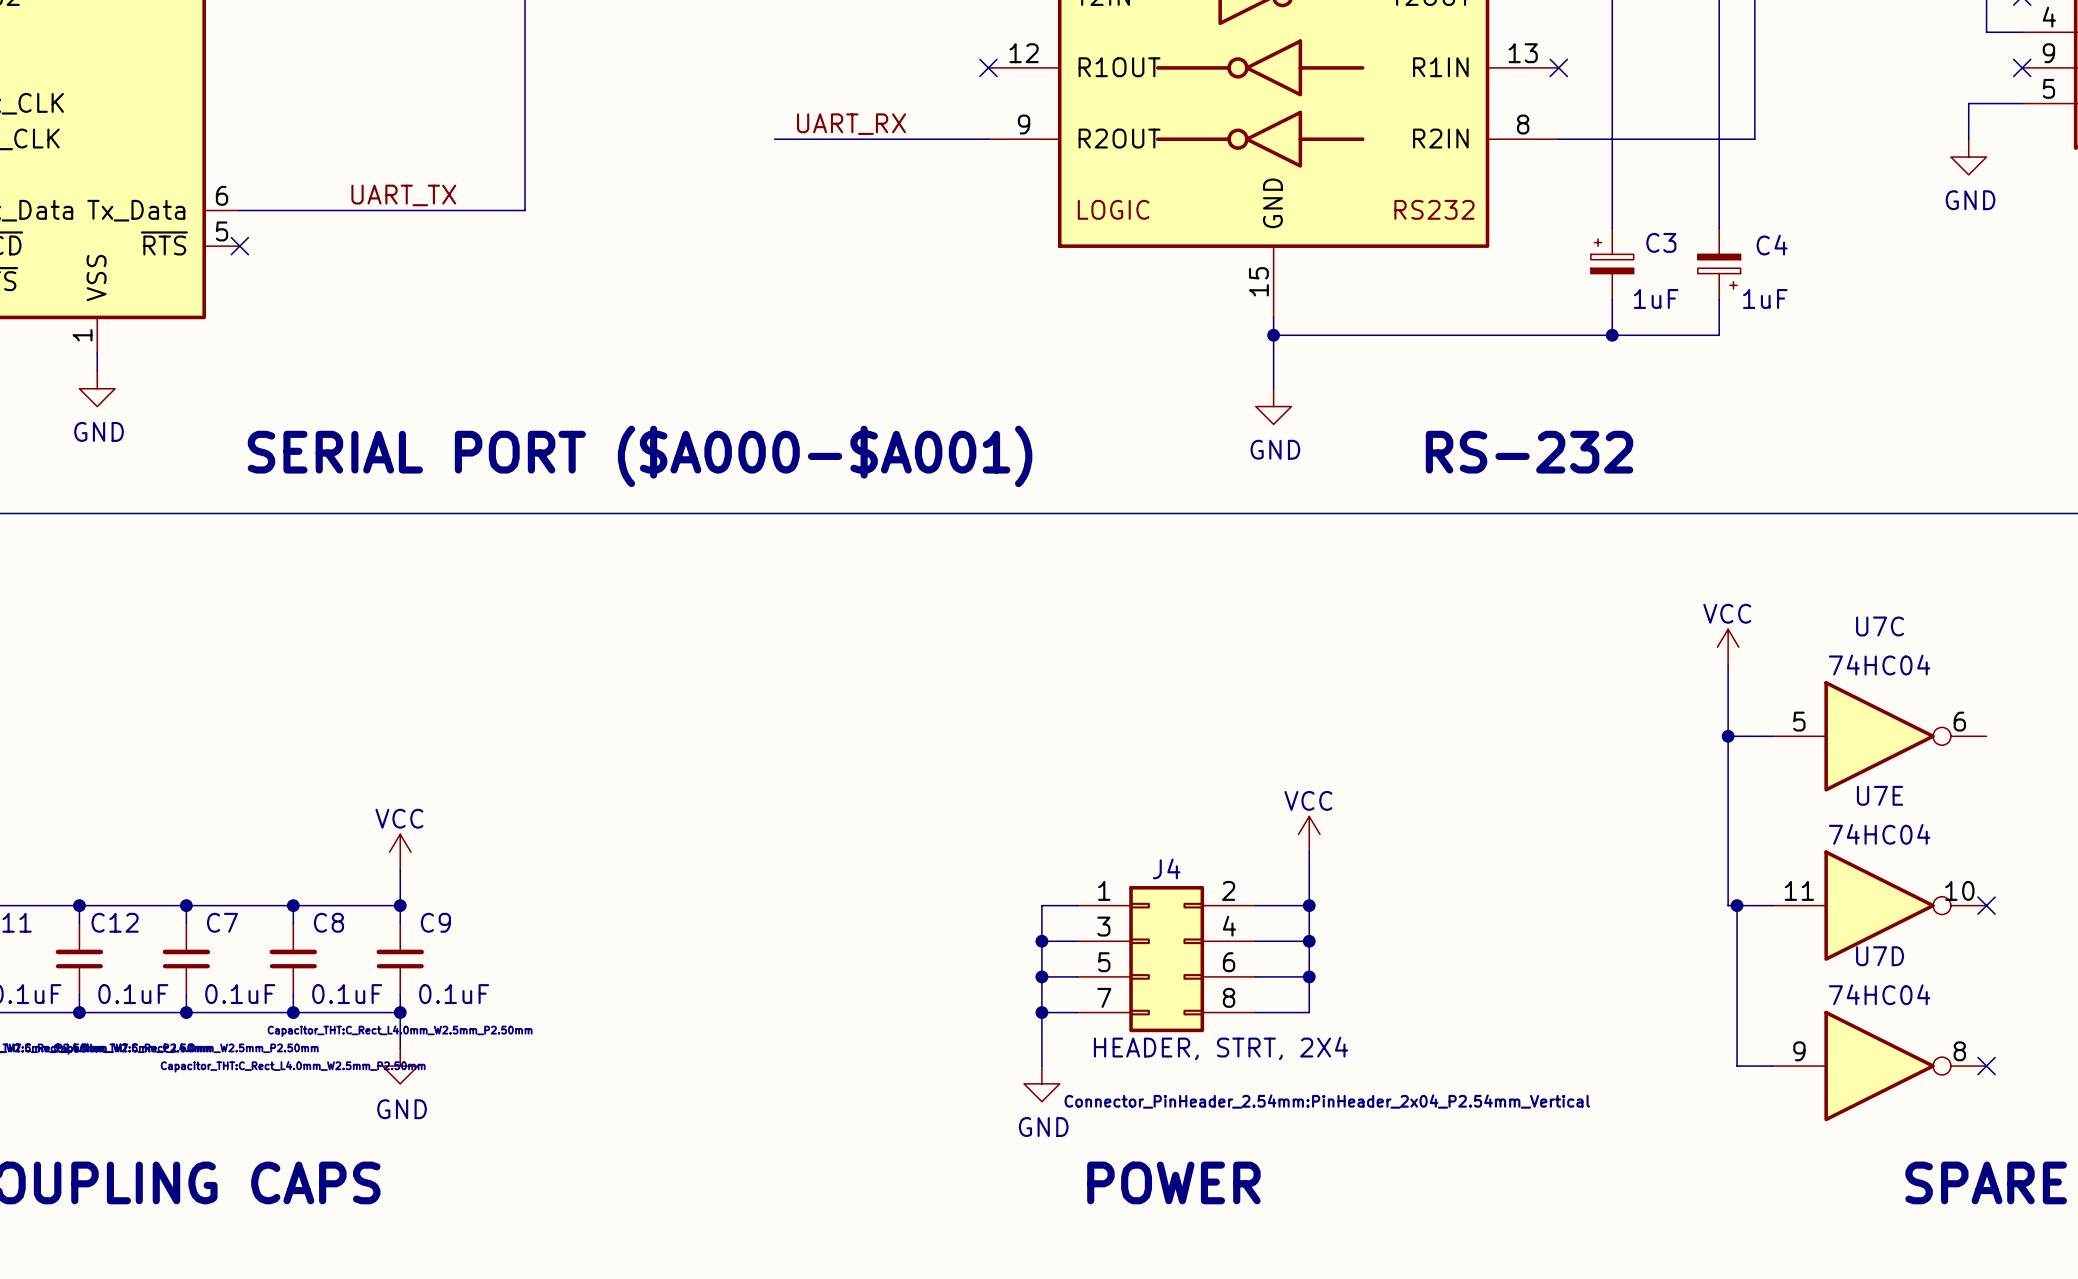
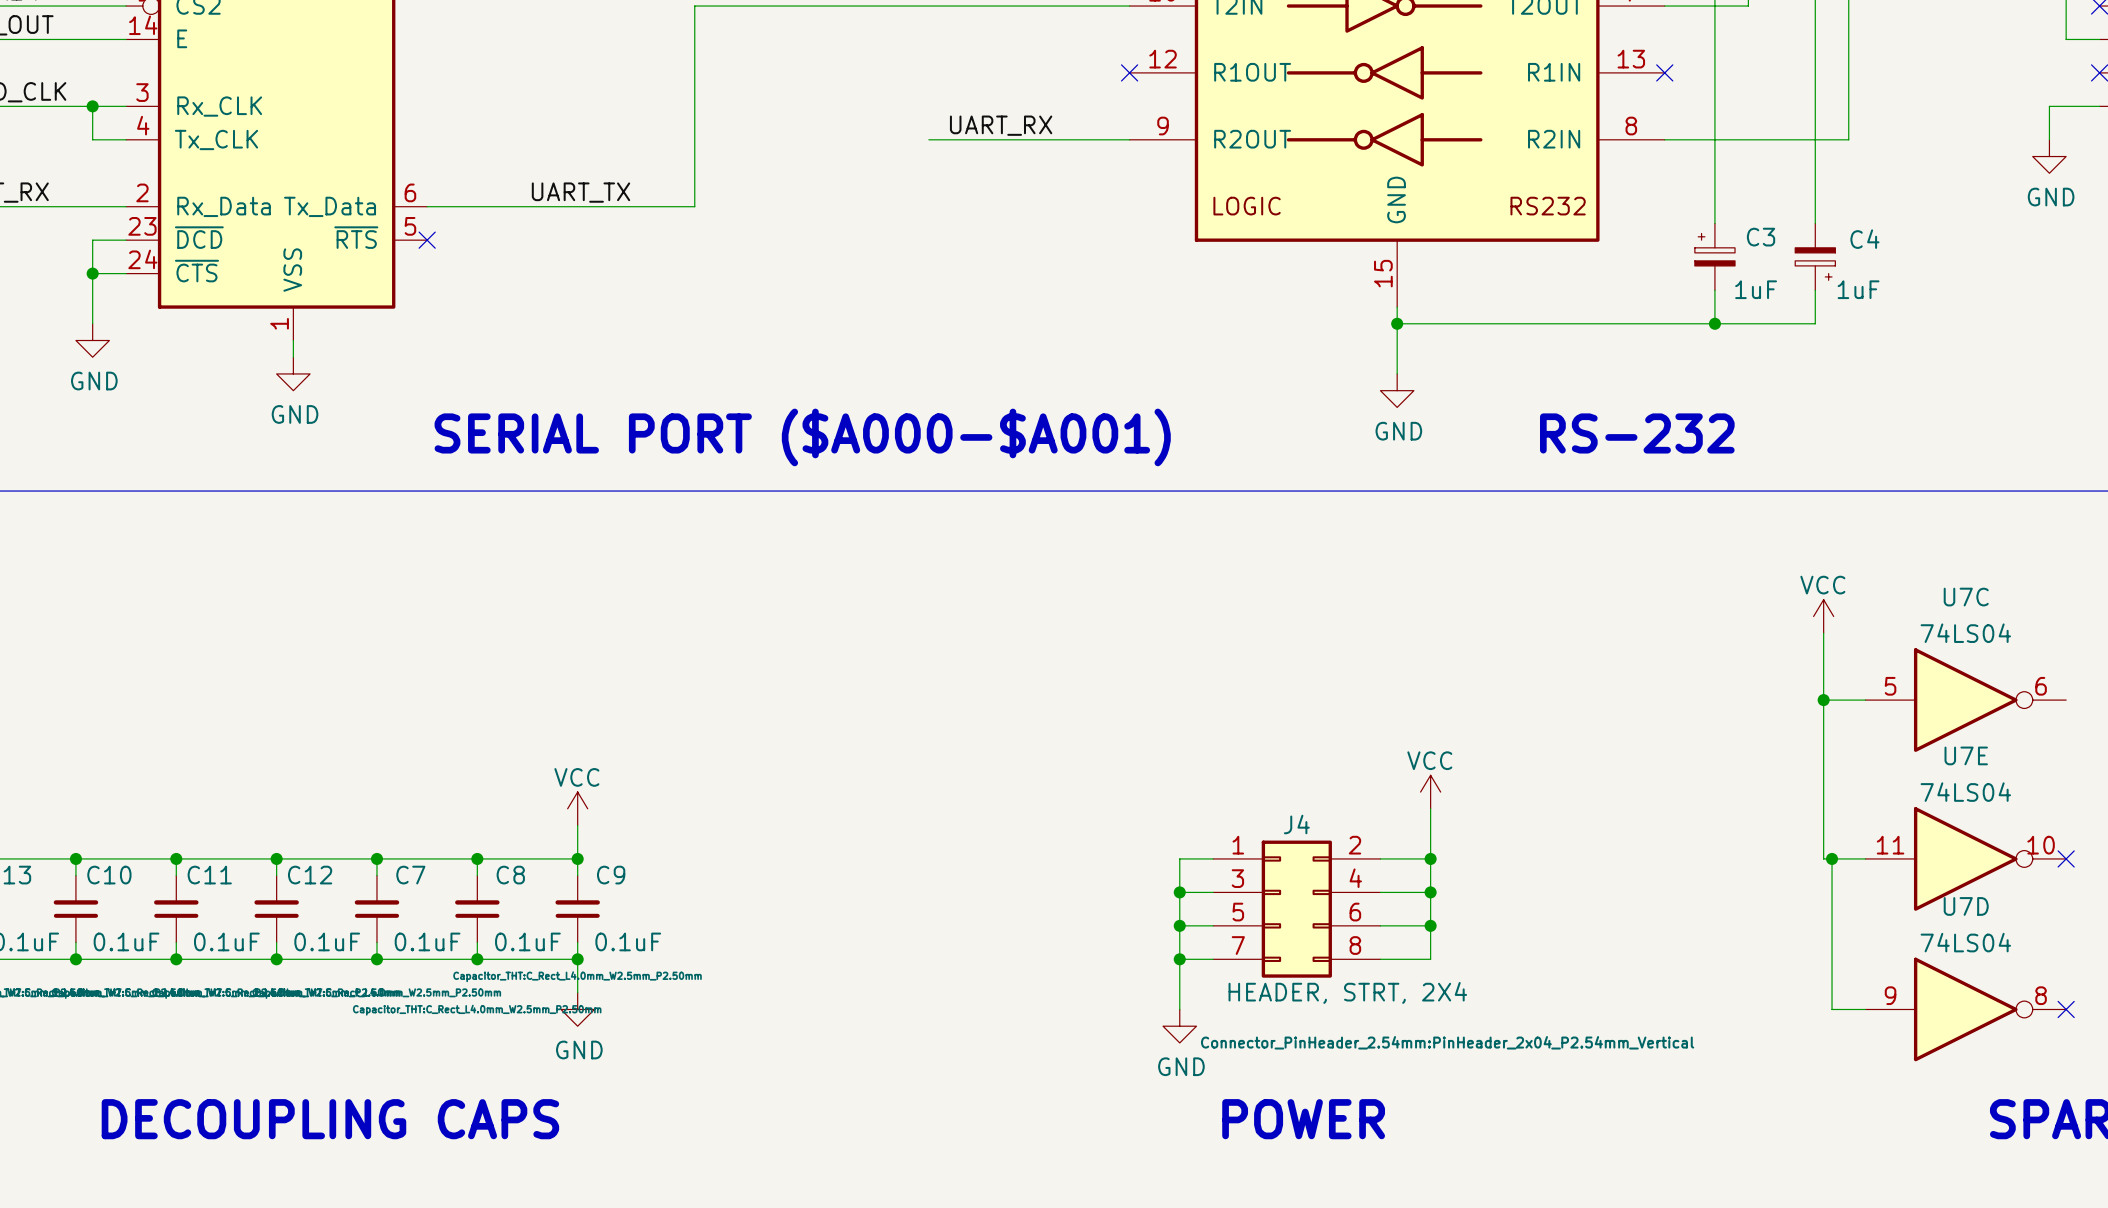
U7C value: 74HC04 (1879, 665) -> 74LS04 (1965, 633)
U7E value: 74HC04 (1879, 834) -> 74LS04 (1965, 792)
U7D value: 74HC04 (1879, 994) -> 74LS04 (1965, 942)

